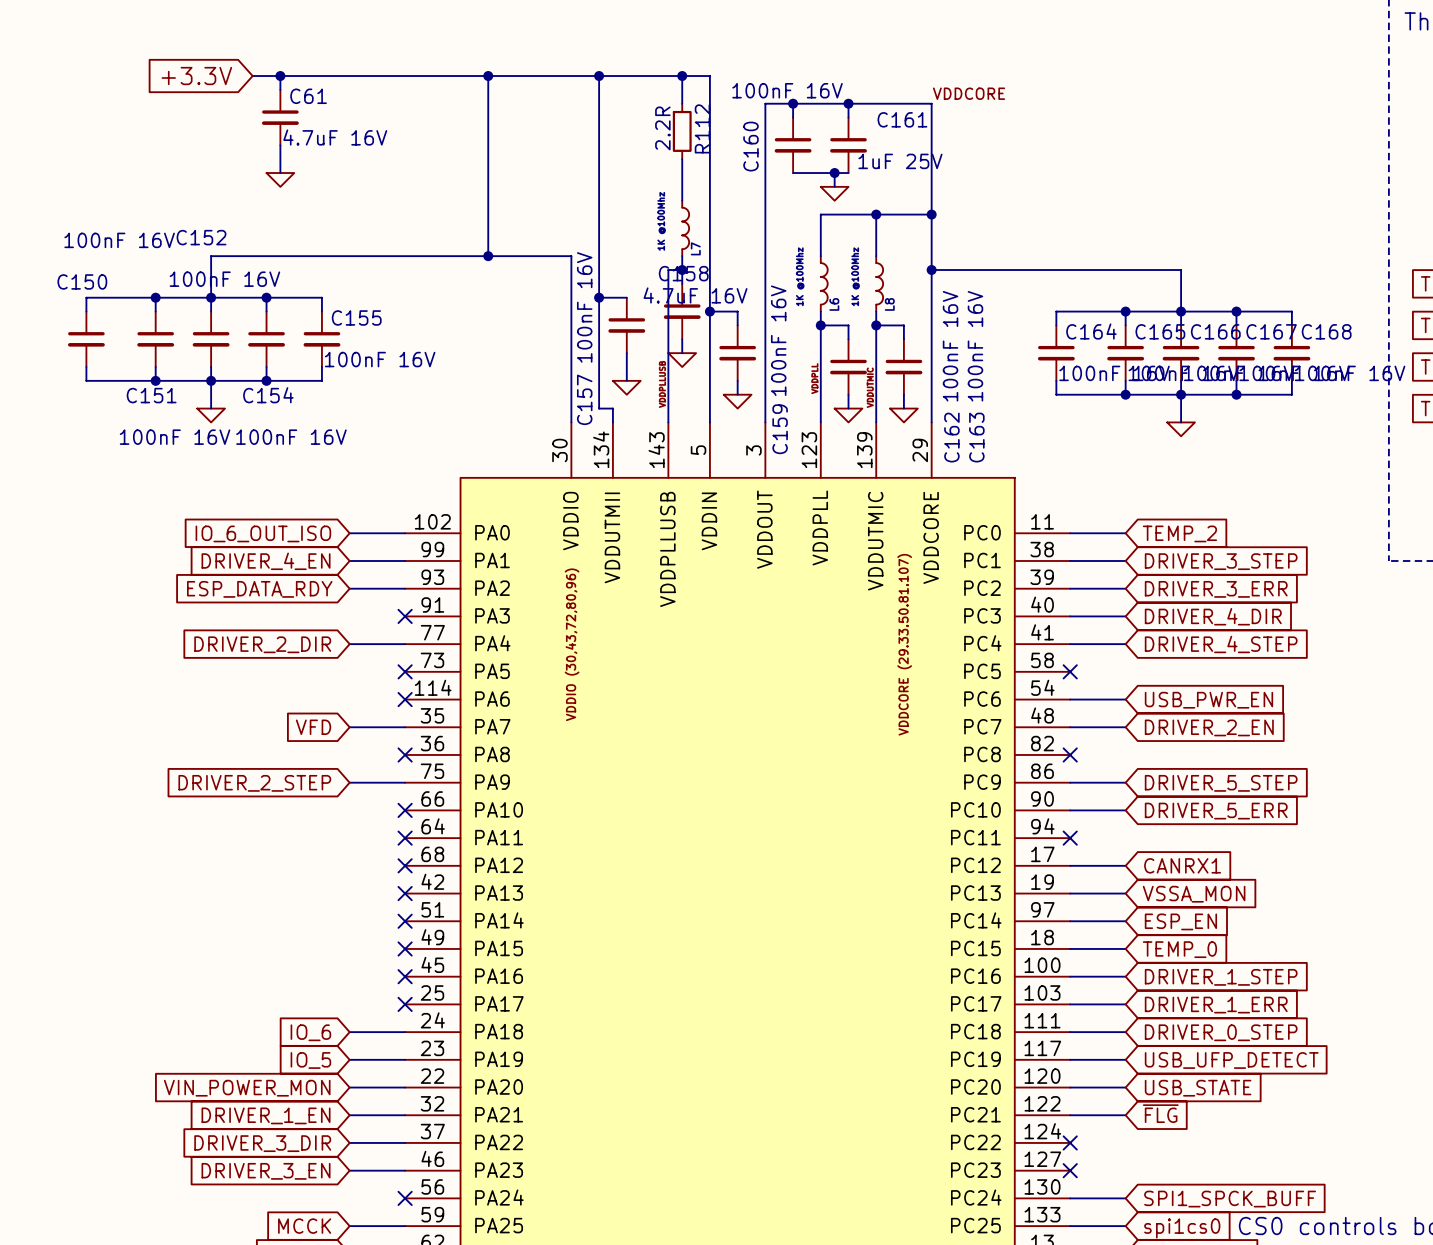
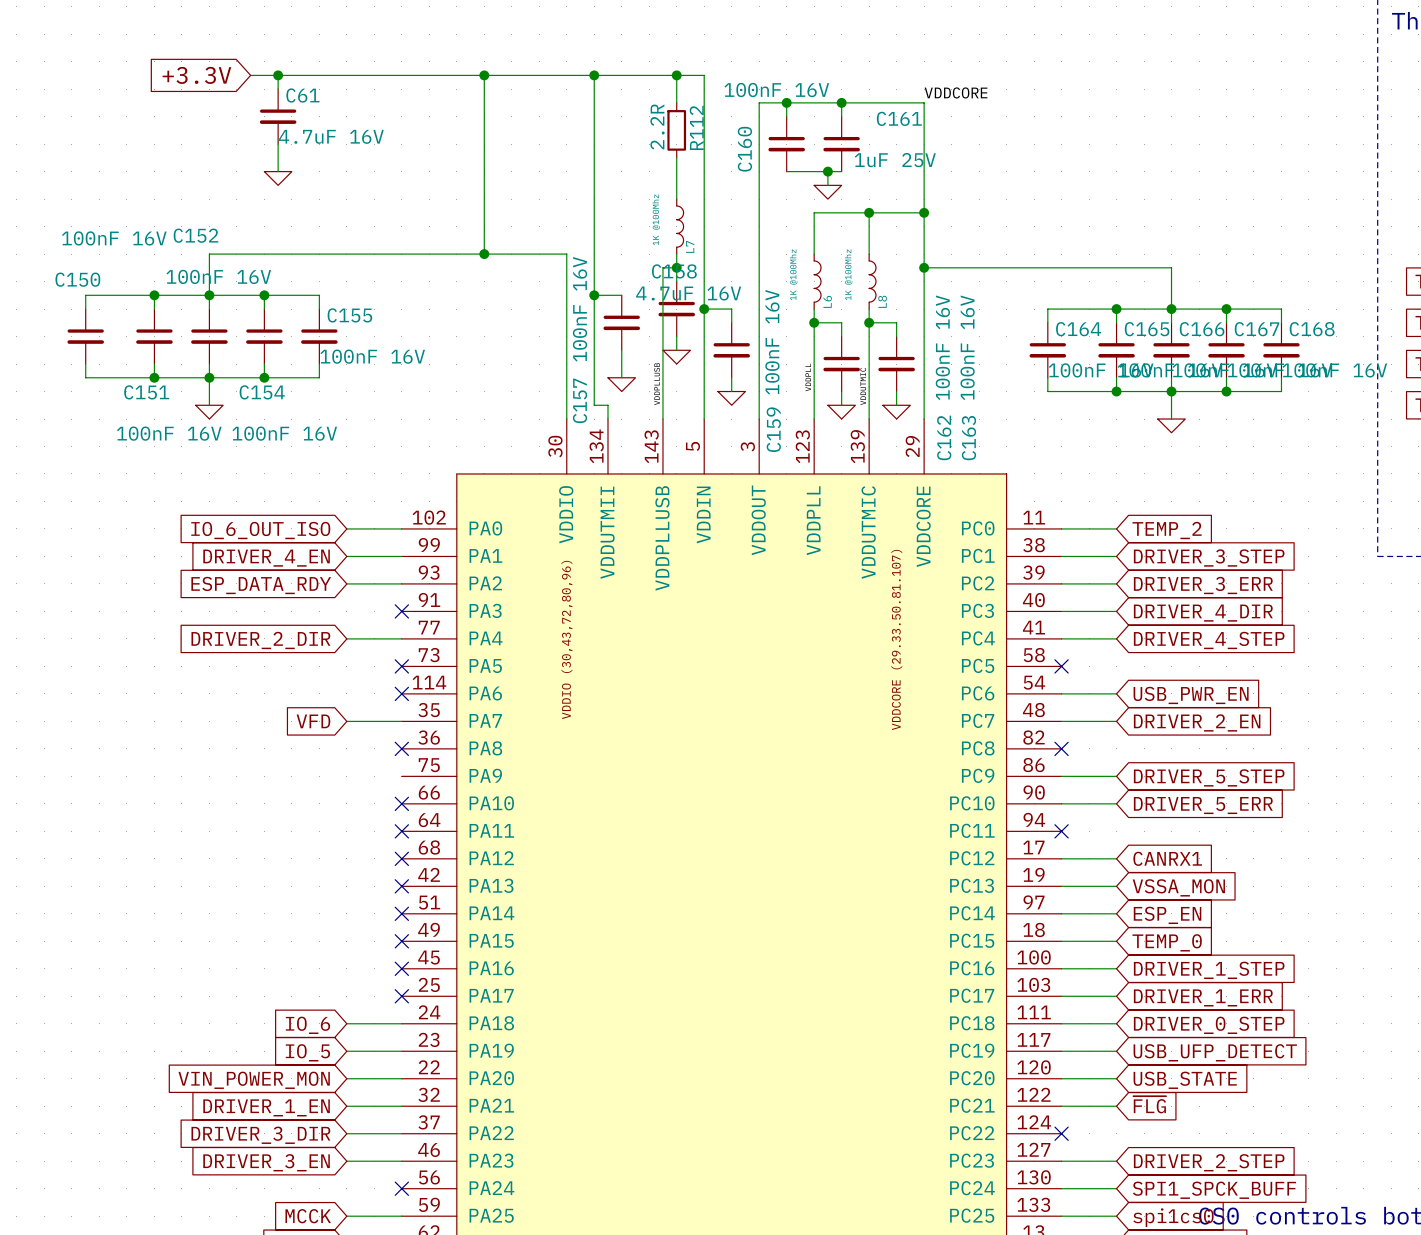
wire: (349, 782) (405, 782) -> none
global label: DRIVER_2_STEP (254, 783) -> none
wire: none -> (1061, 1161) (1116, 1161)
no-connect mark: (1070, 1170) -> none
global label: none -> DRIVER_2_STEP (1209, 1162)

